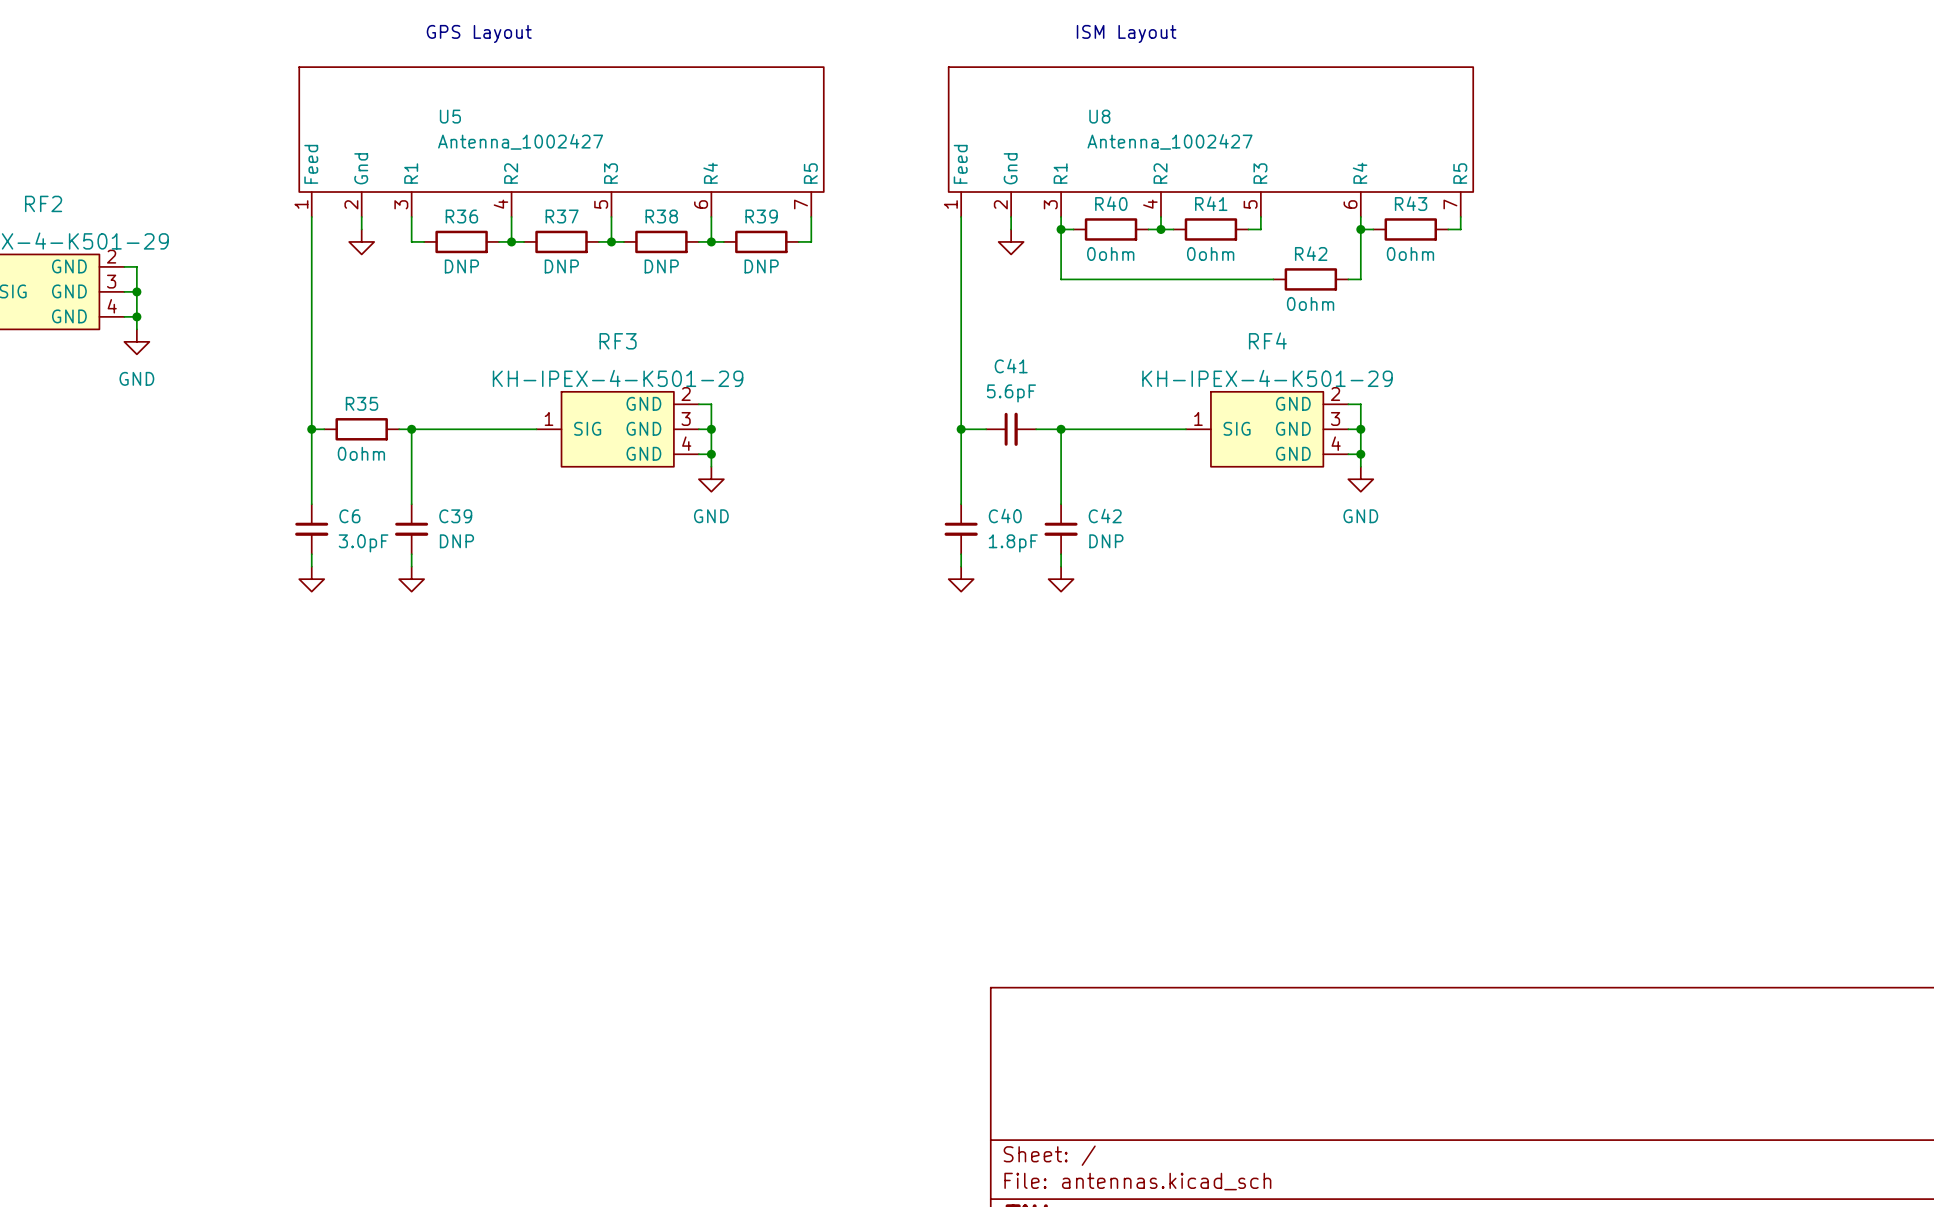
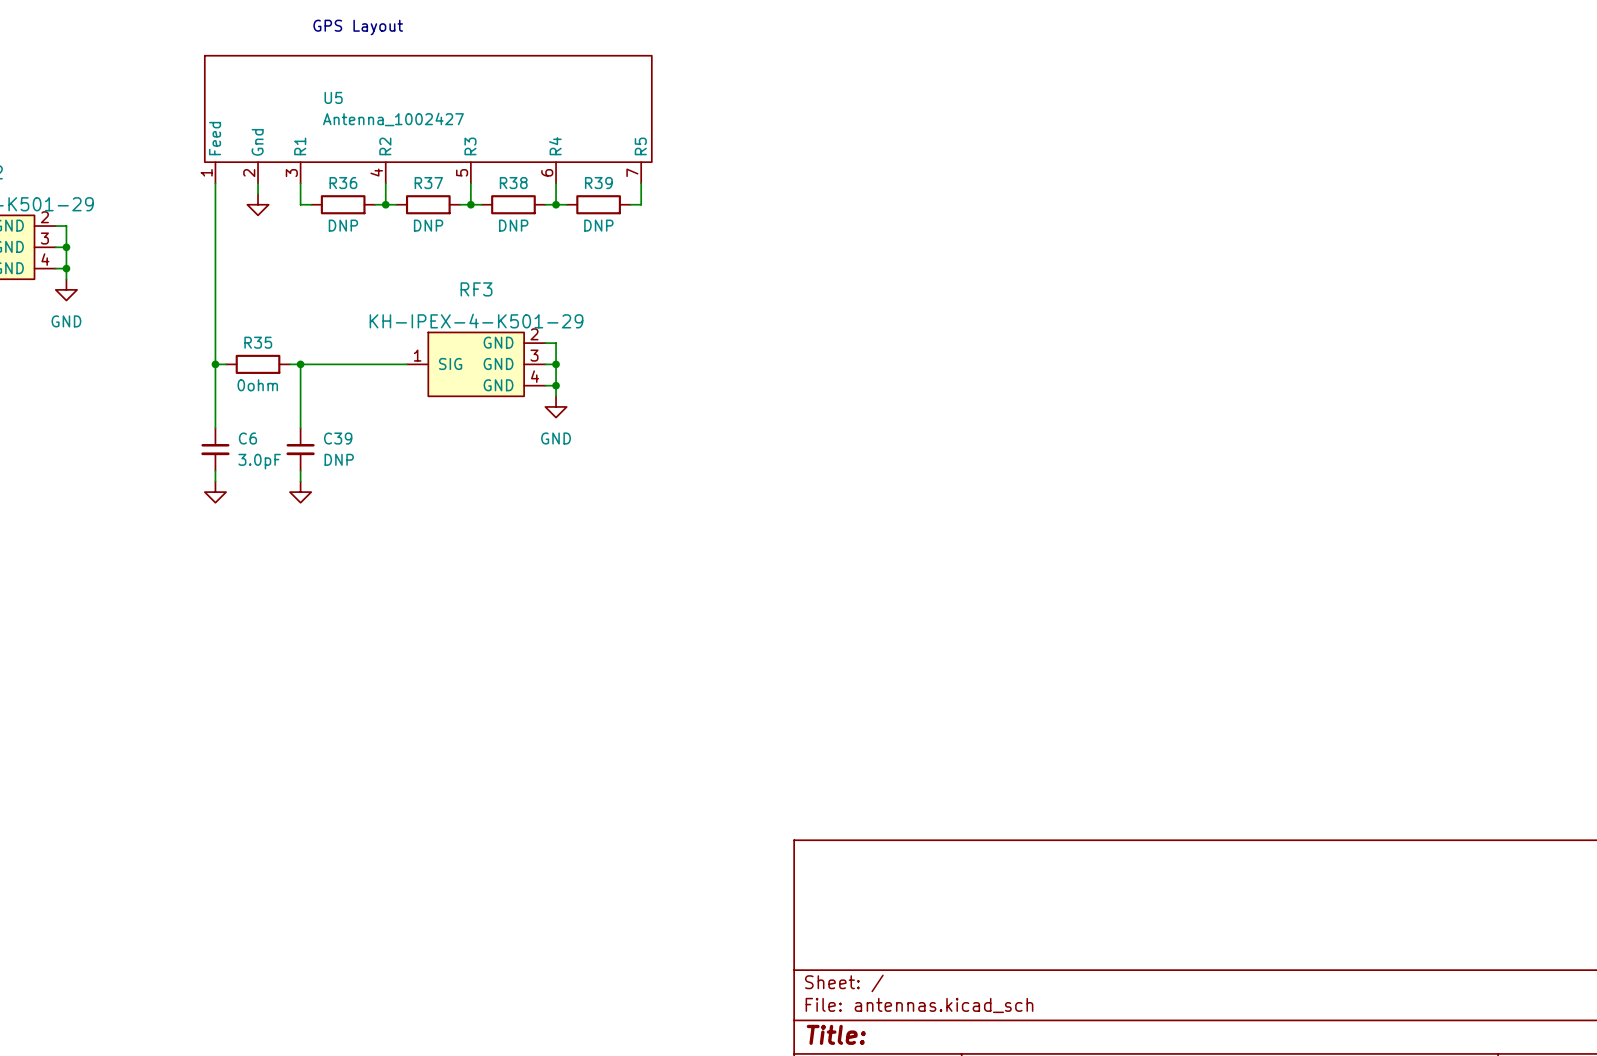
text: ISM Layout (1126, 33) -> none
U8: Antenna_1002427 (1210, 142) -> none
wire: (961, 216) (961, 504) -> none
wire: (1011, 216) (1011, 229) -> none
wire: (1061, 216) (1061, 279) (1273, 279) -> none
wire: (1160, 216) (1160, 229) -> none
wire: (1260, 216) (1260, 229) (1248, 229) -> none
wire: (1360, 216) (1360, 279) (1348, 279) -> none
wire: (1460, 216) (1460, 229) (1448, 229) -> none
wire: (1061, 229) (1073, 229) -> none
junction: (1061, 229) -> none
R40: 0ohm (1111, 229) -> none
wire: (1148, 229) (1173, 229) -> none
junction: (1160, 229) -> none
R41: 0ohm (1210, 229) -> none
wire: (1360, 229) (1373, 229) -> none
junction: (1360, 229) -> none
R43: 0ohm (1410, 229) -> none
power symbol: (1011, 241) -> none
R42: 0ohm (1310, 279) -> none
wire: (1348, 404) (1360, 404) (1360, 466) -> none
wire: (961, 429) (986, 429) -> none
junction: (961, 429) -> none
C41: 5.6pF (1011, 429) -> none
wire: (1036, 429) (1185, 429) -> none
wire: (1061, 429) (1061, 504) -> none
junction: (1061, 429) -> none
RF4: KH-IPEX-4-K501-29 (1267, 429) -> none
wire: (1348, 429) (1360, 429) -> none
junction: (1360, 429) -> none
wire: (1348, 454) (1360, 454) -> none
junction: (1360, 454) -> none
power symbol: GND (1360, 479) -> none
C40: 1.8pF (961, 529) -> none
C42: DNP (1061, 529) -> none
wire: (961, 554) (961, 566) -> none
wire: (1061, 554) (1061, 566) -> none
power symbol: (961, 579) -> none
power symbol: (1061, 579) -> none

